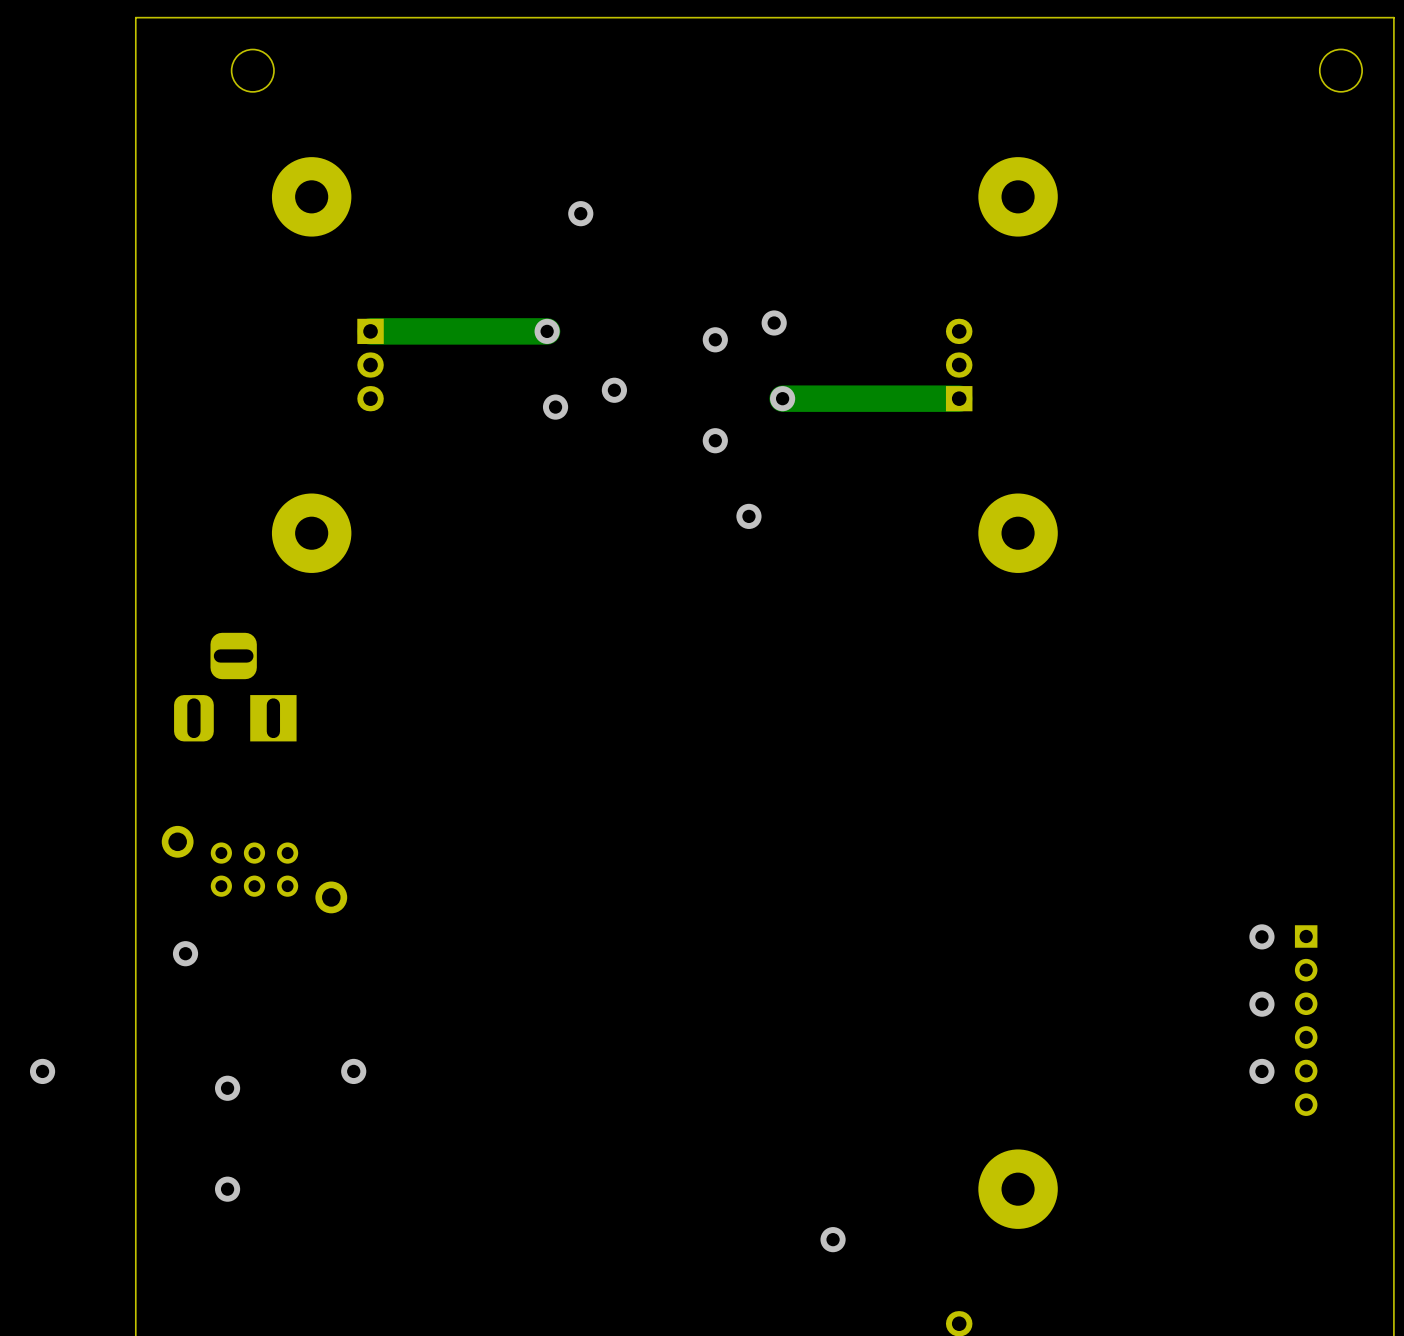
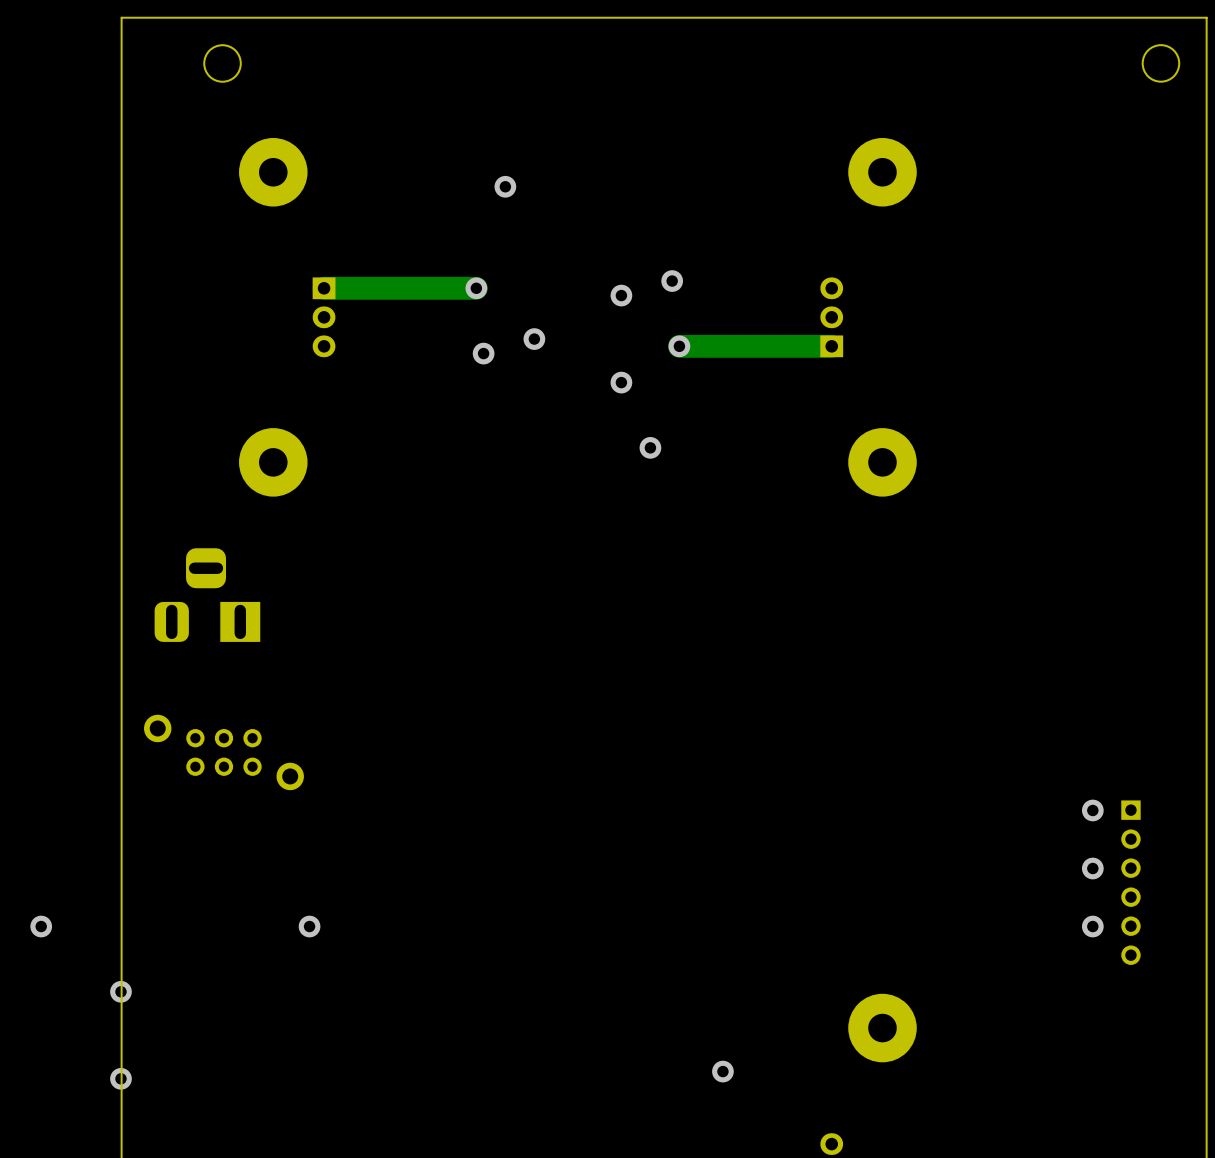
via: (185, 953) -> none
via: (227, 1088) -> none
via: none -> (120, 991)
via: (227, 1189) -> none
via: none -> (120, 1078)

